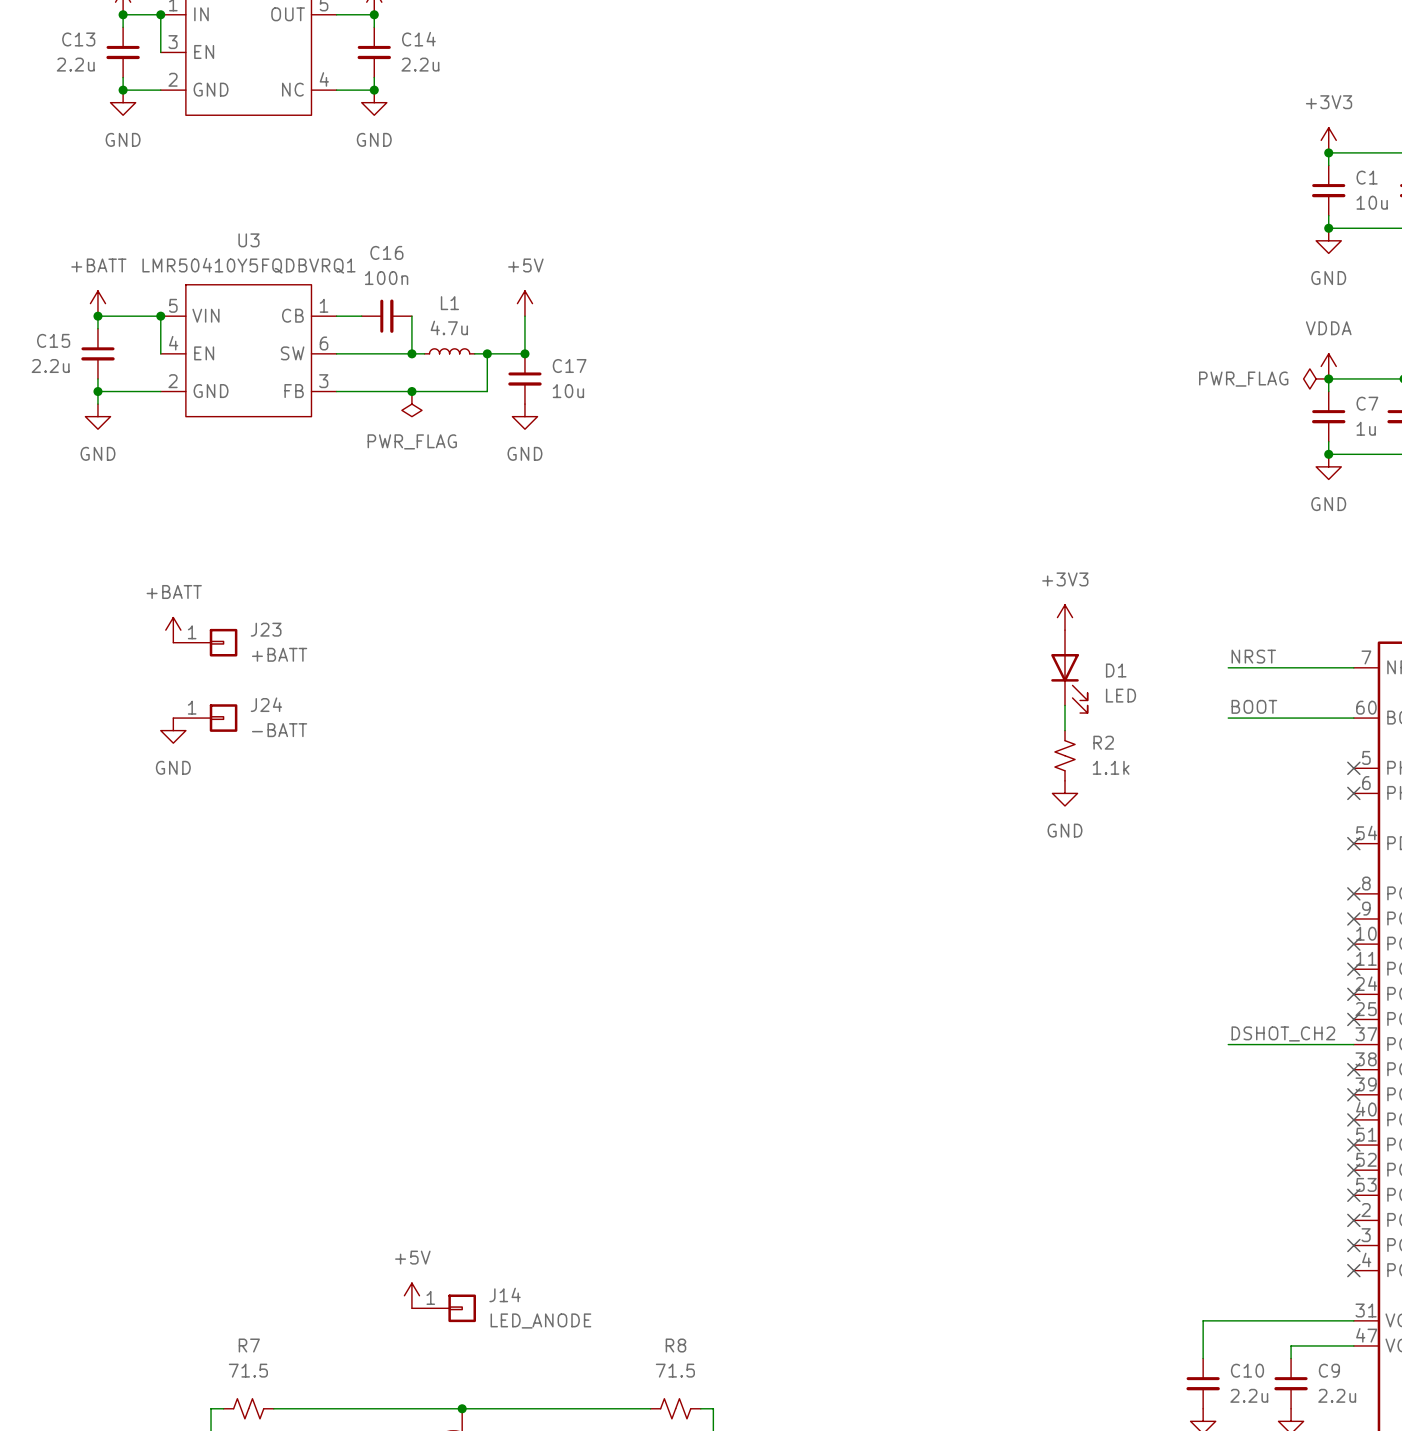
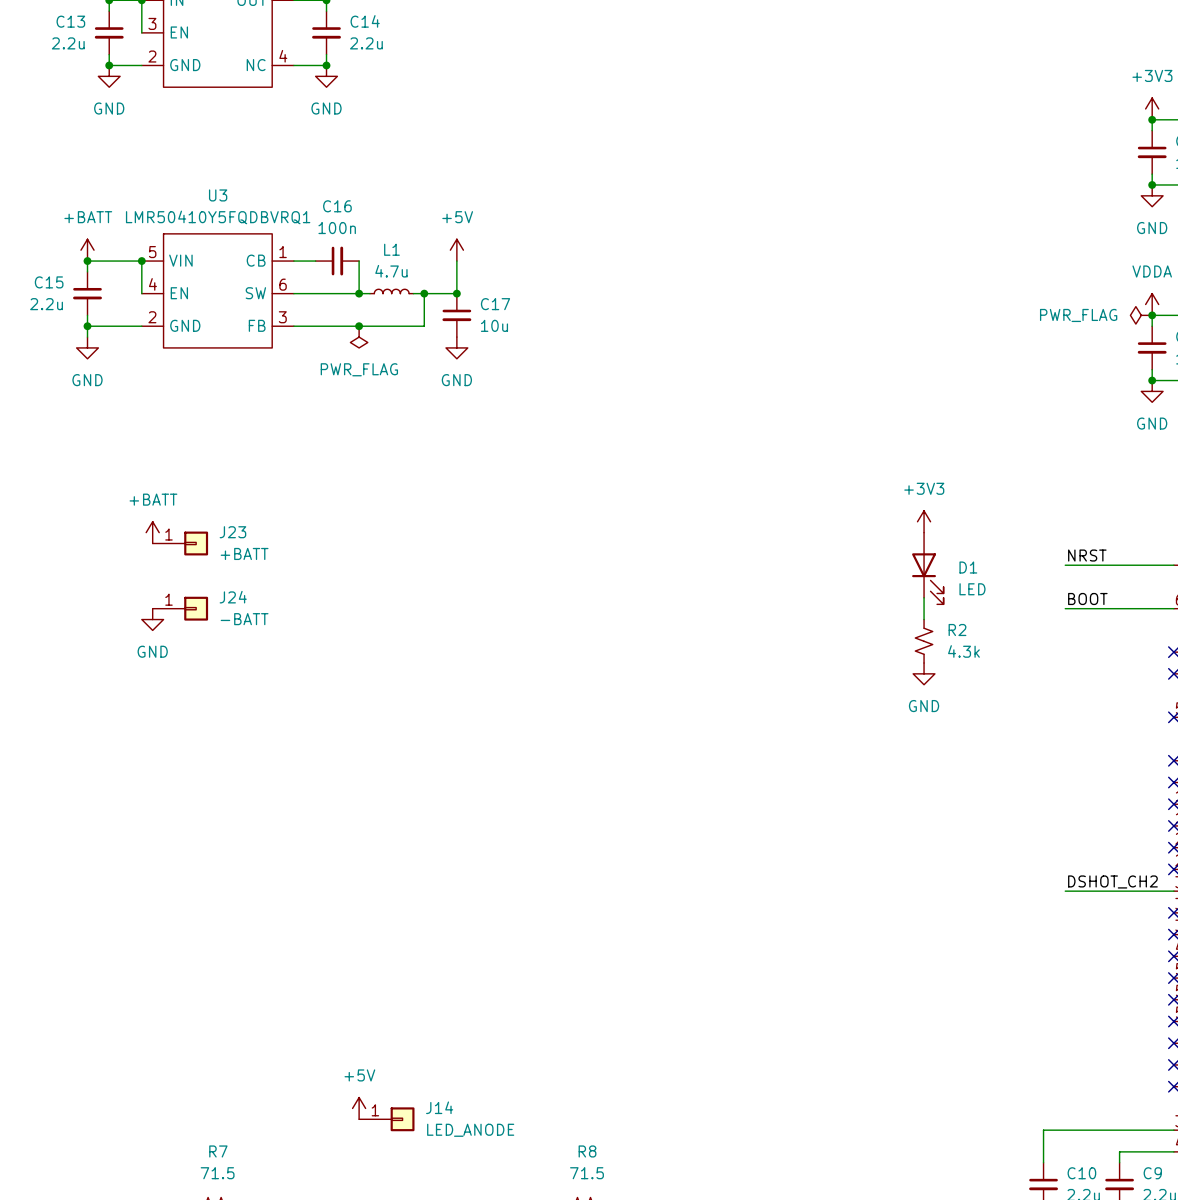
R2 value: 1.1k (1111, 767) -> 4.3k (963, 651)

